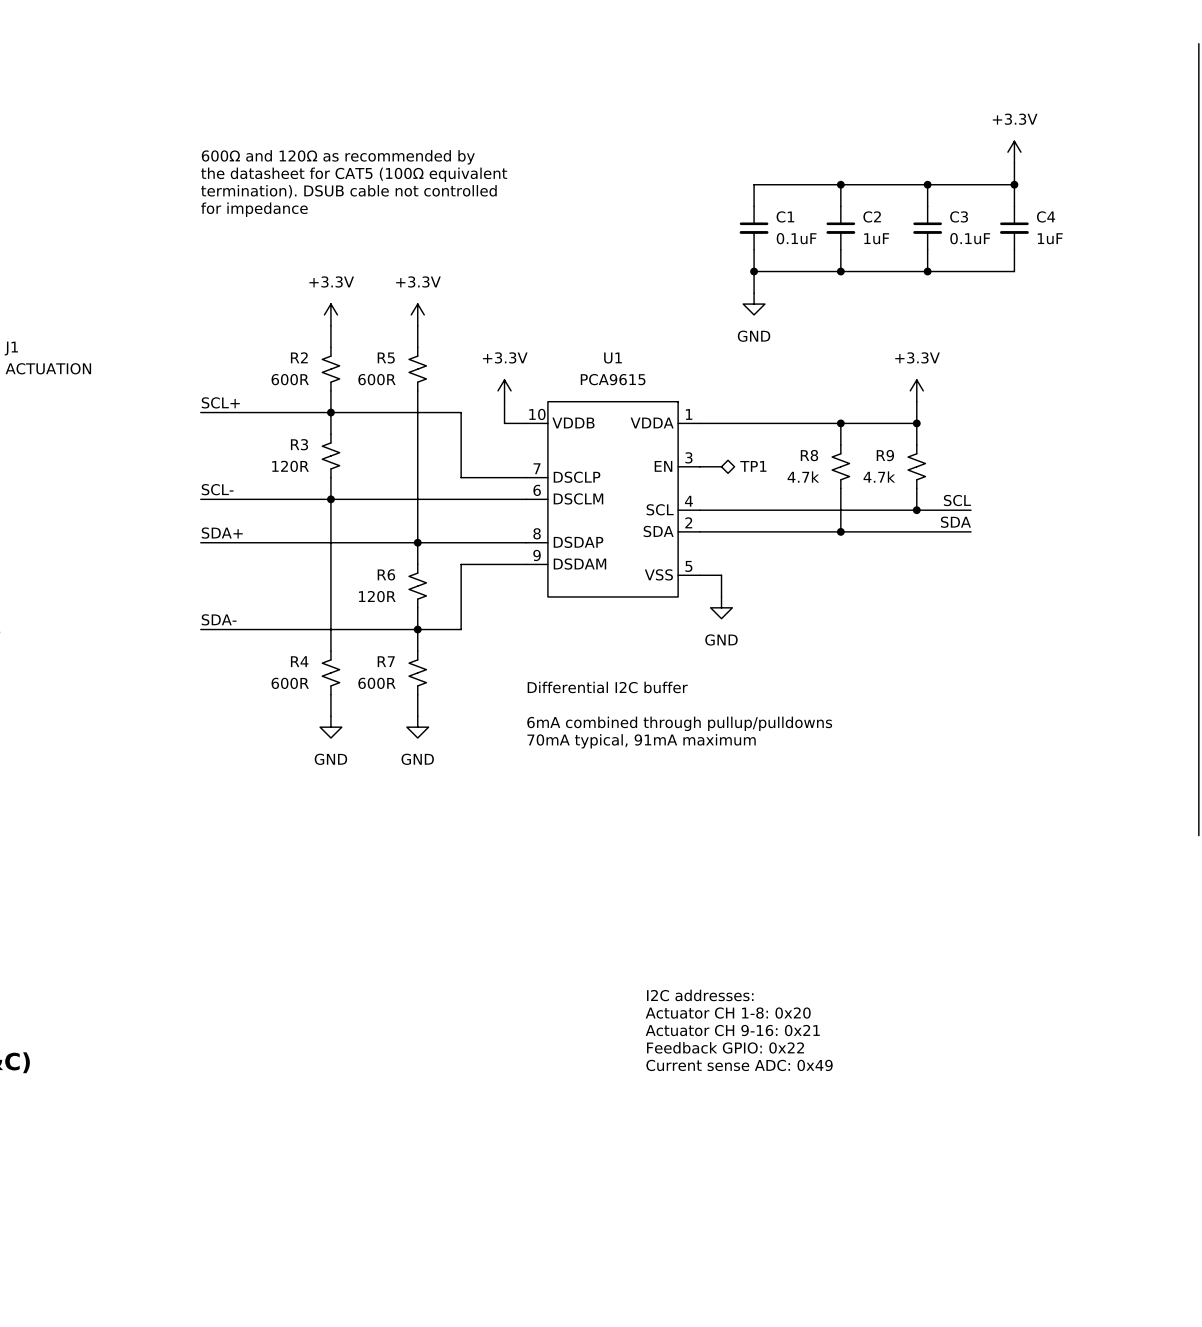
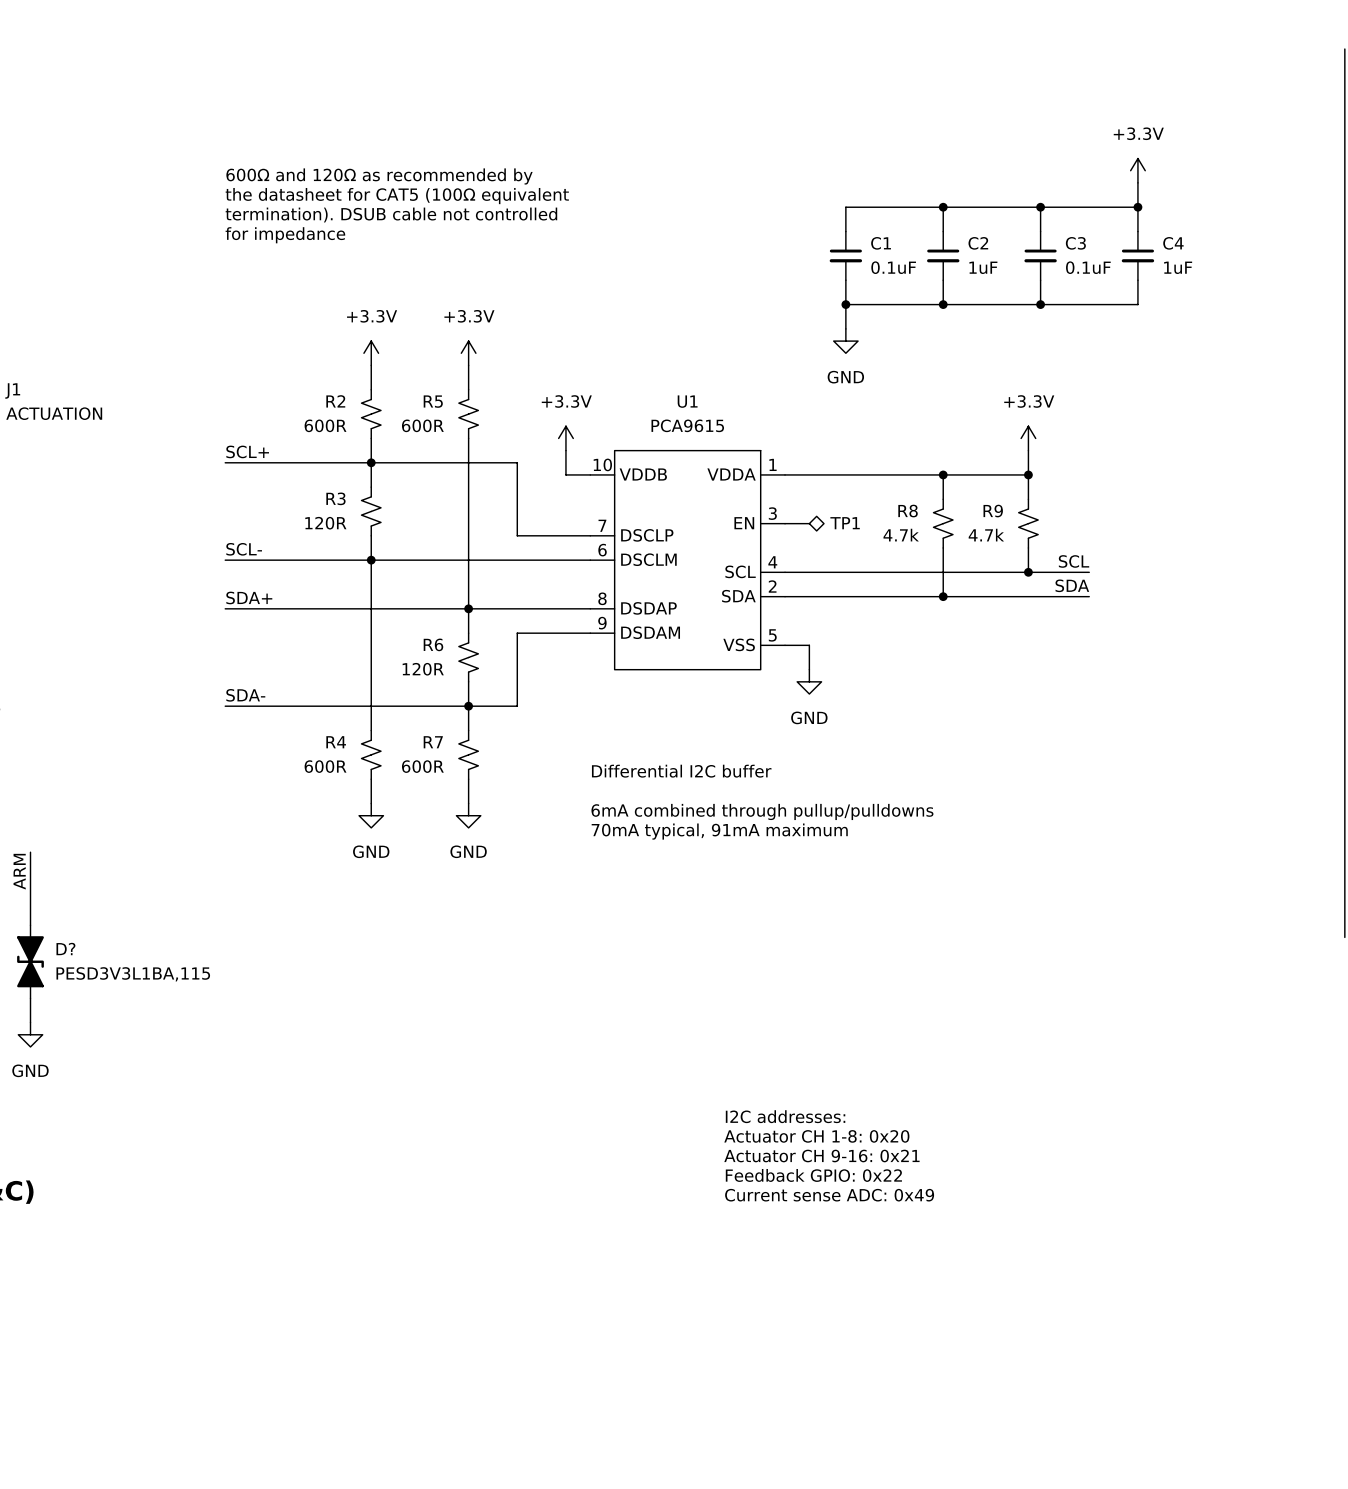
wire: none -> (30, 852) (30, 925)
label: none -> ARM (19, 871)
D?: none -> PESD3V3L1BA,115 (30, 961)
wire: none -> (30, 998) (30, 1022)
power symbol: none -> GND (30, 1034)

